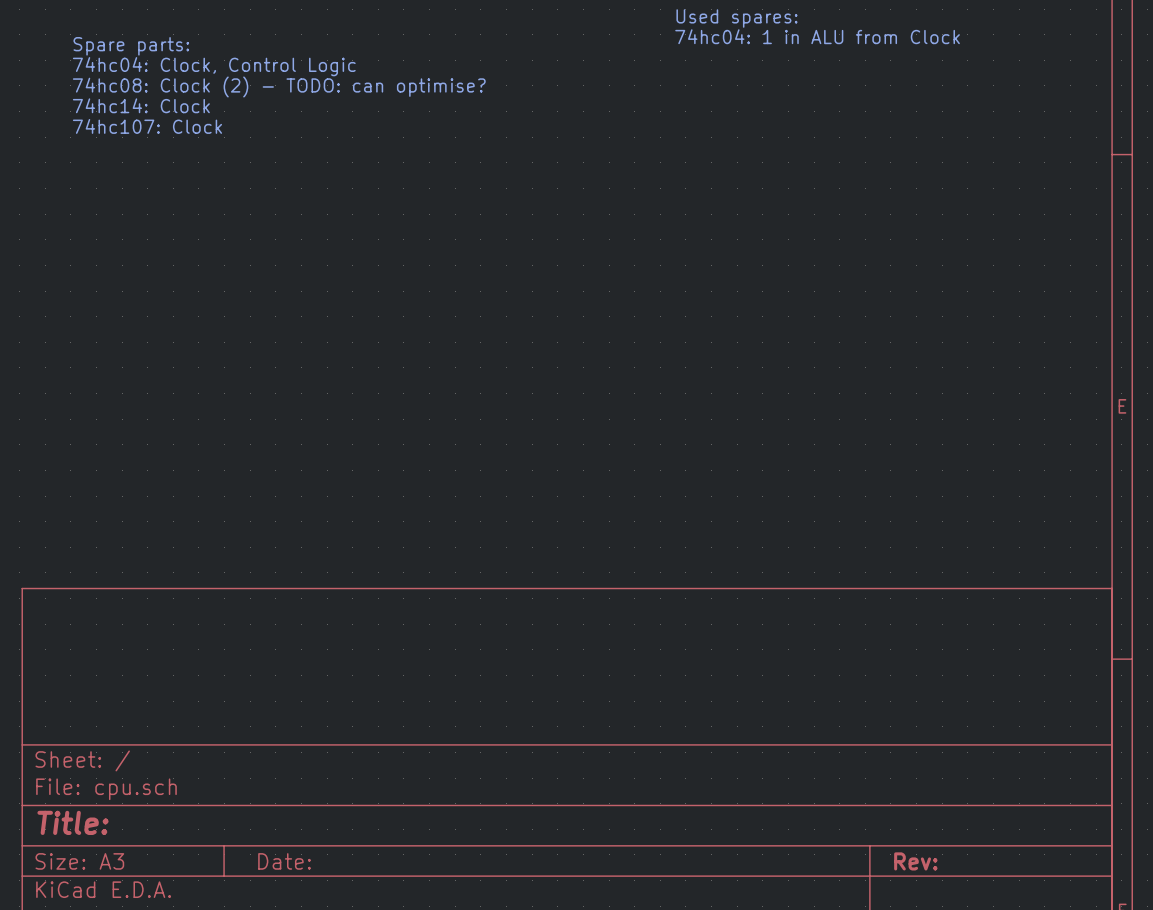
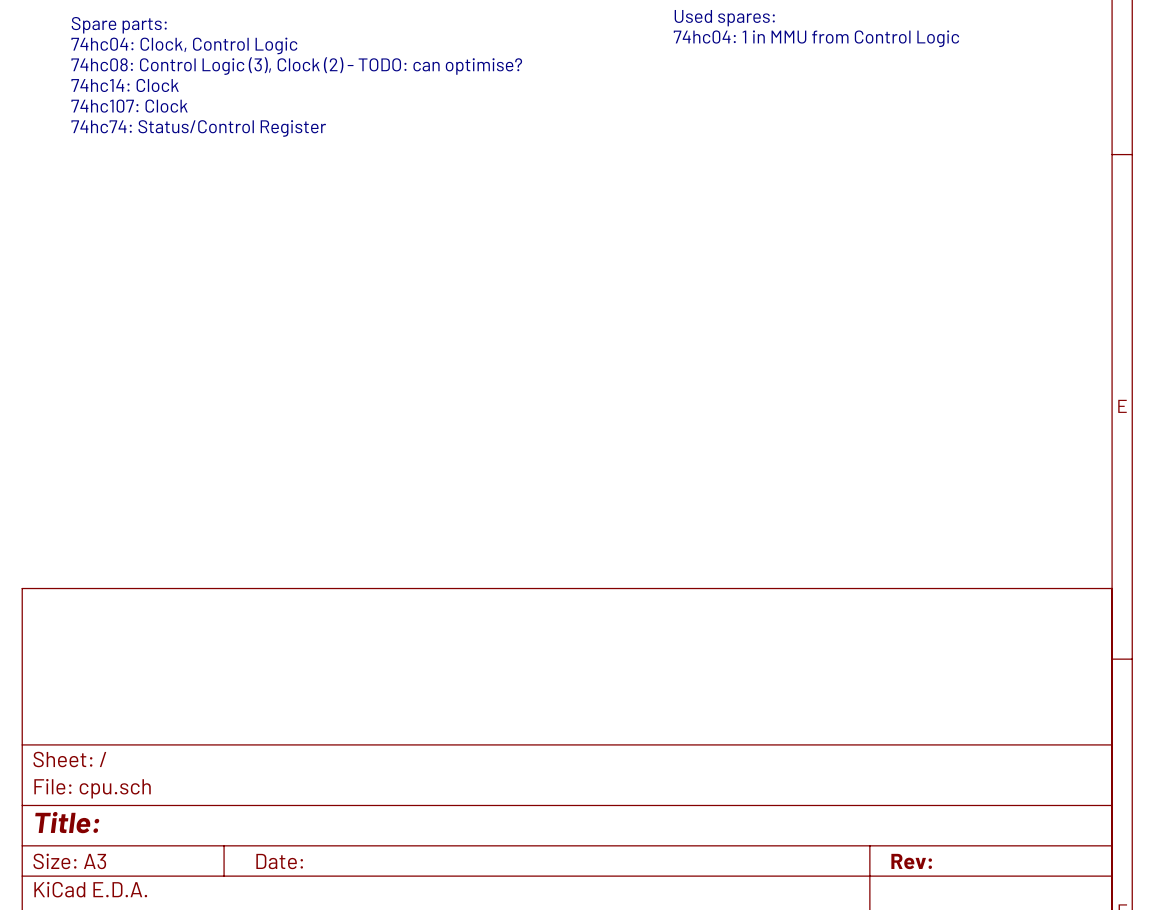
text: none -> Spare parts: (119, 25)
text: 74hc04: 1 in ALU from Clock (817, 36) -> 74hc04: 1 in MMU from Control Logic (816, 38)
text: Spare parts: (131, 46) -> 74hc04: Clock, Control Logic (184, 45)
text: 74hc04: Clock, Control Logic (214, 66) -> 74hc08: Control Logic (3), Clock (2) - TODO: can optimise? (296, 66)
text: 74hc08: Clock (2) - TODO: can optimise? (279, 86) -> 74hc14: Clock (125, 85)
text: 74hc14: Clock (141, 105) -> 74hc107: Clock (129, 106)
text: 74hc107: Clock (147, 126) -> 74hc74: Status/Control Register (198, 128)

